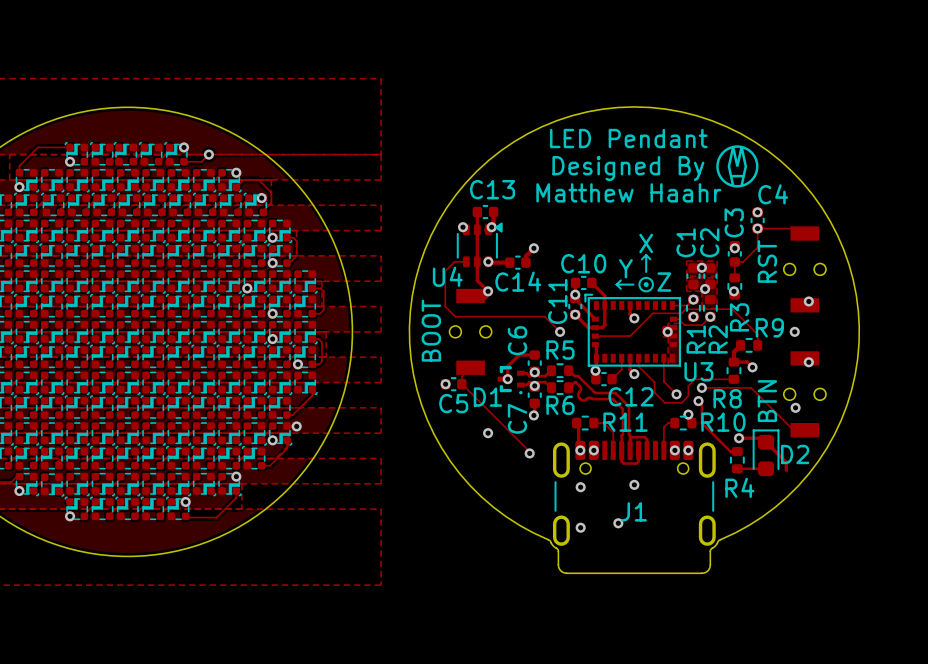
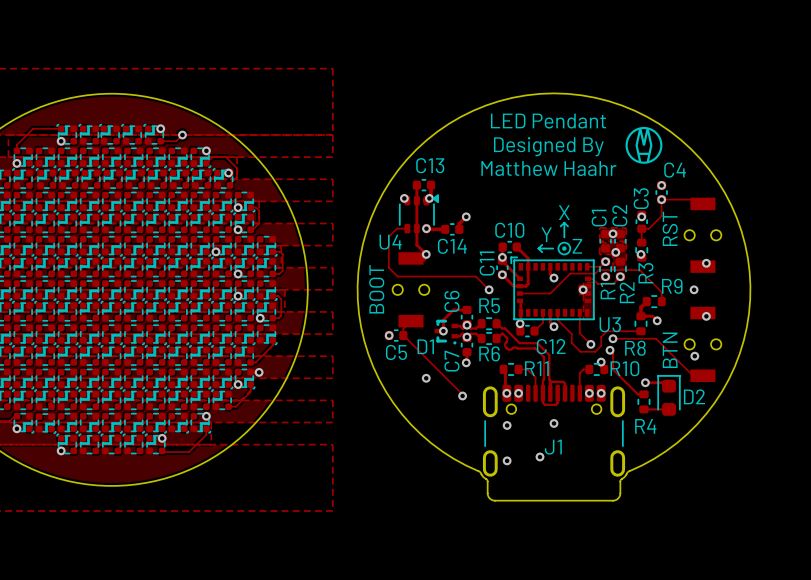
track: (766, 442) (786, 462) (786, 470) -> none

